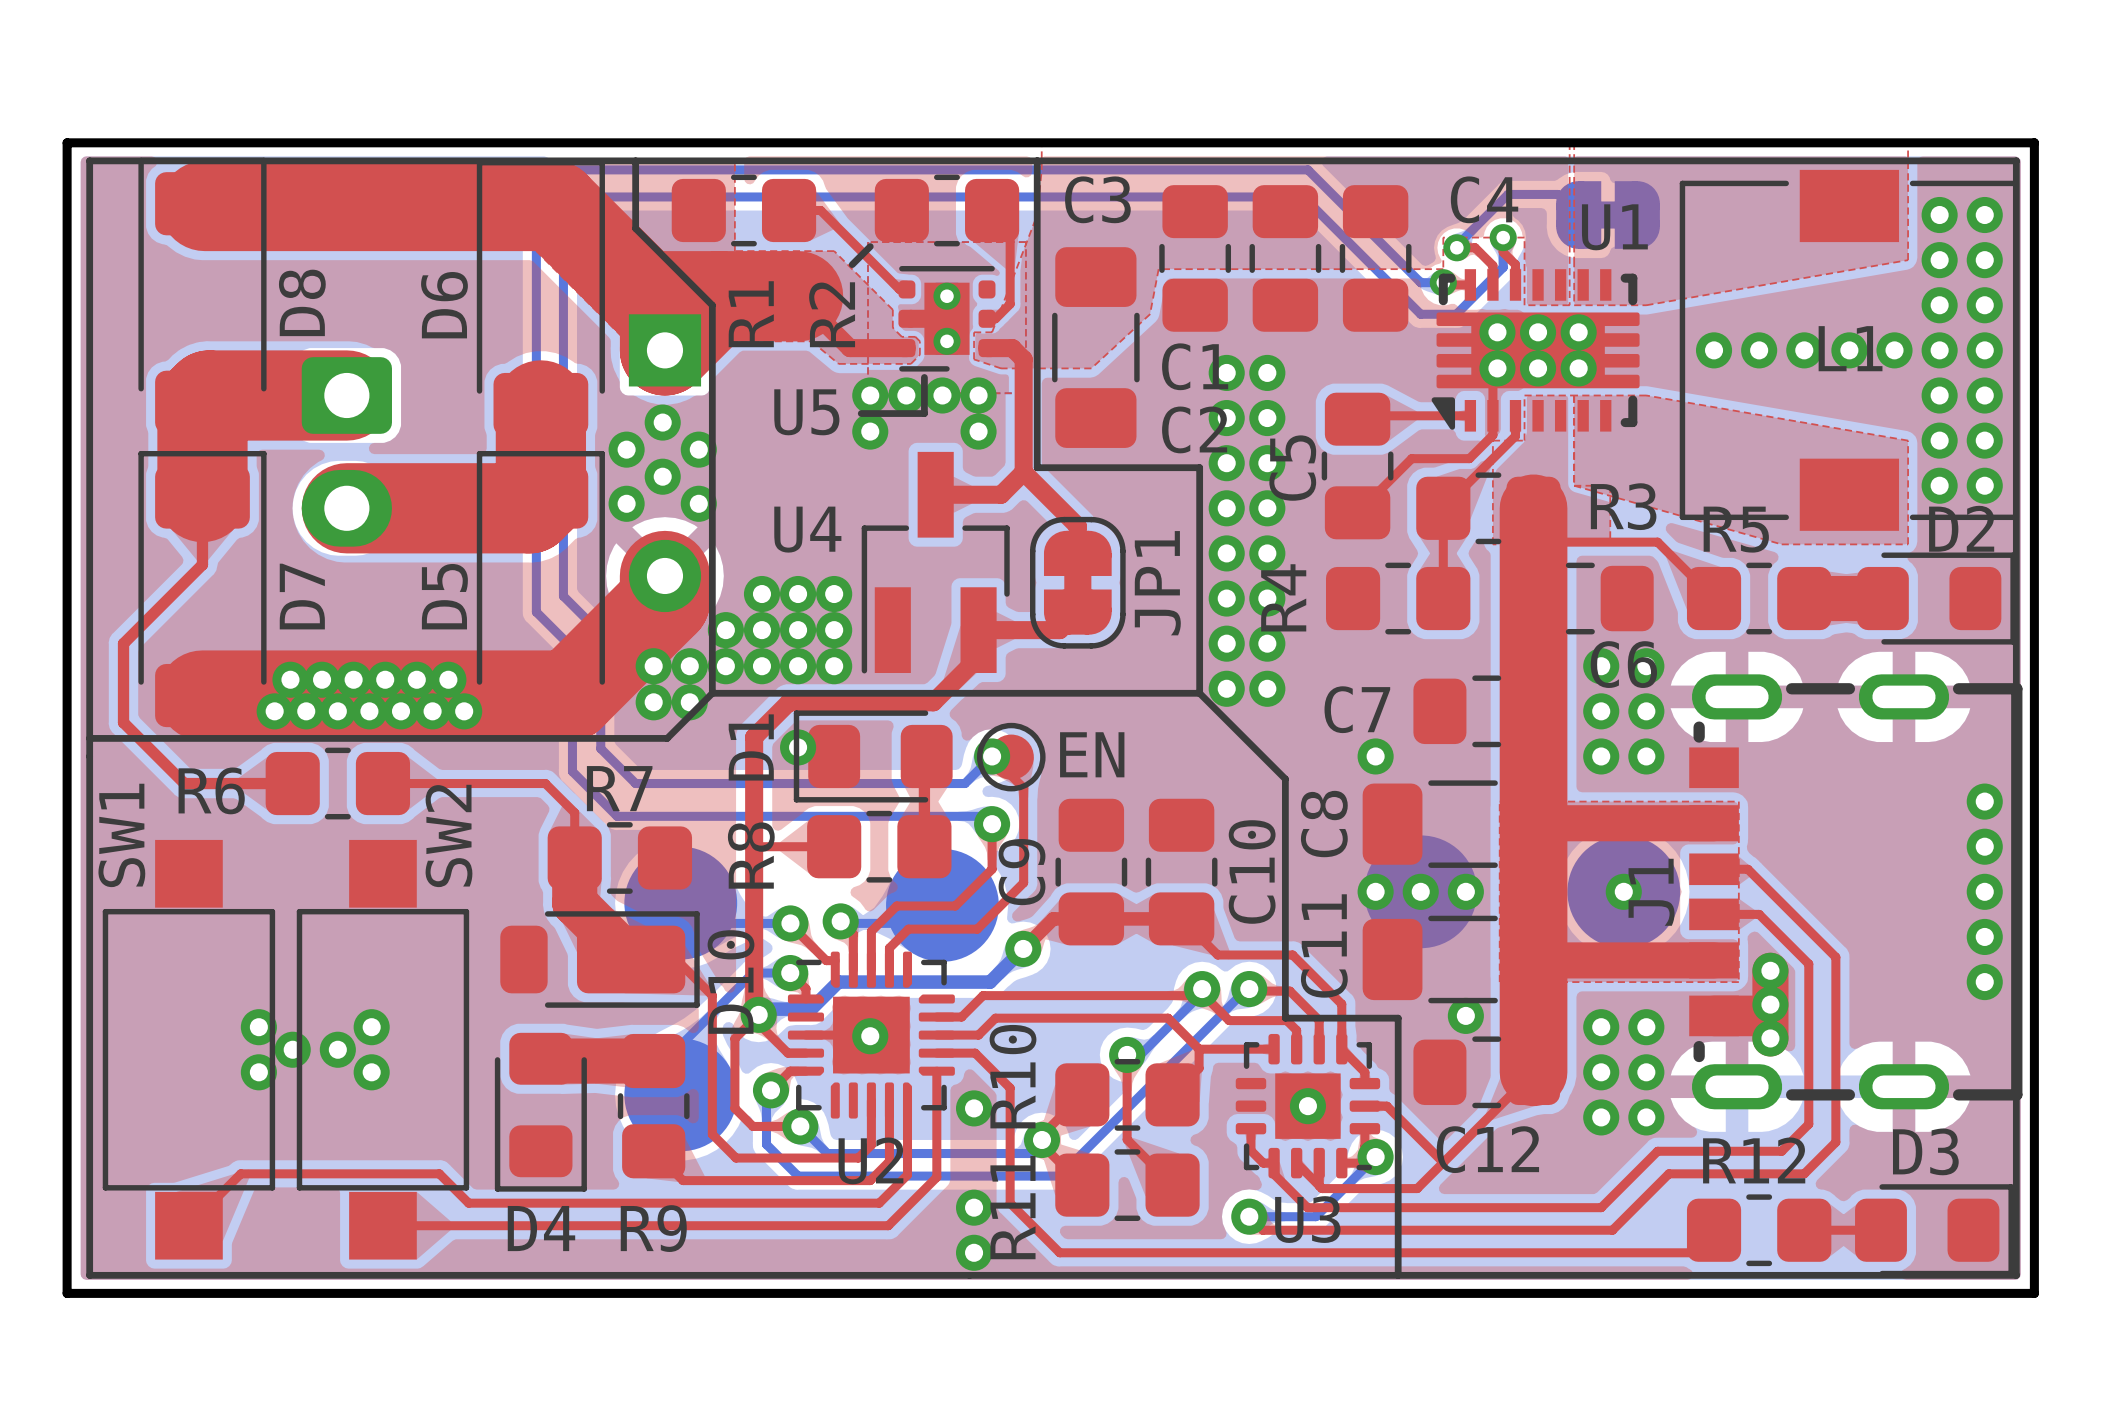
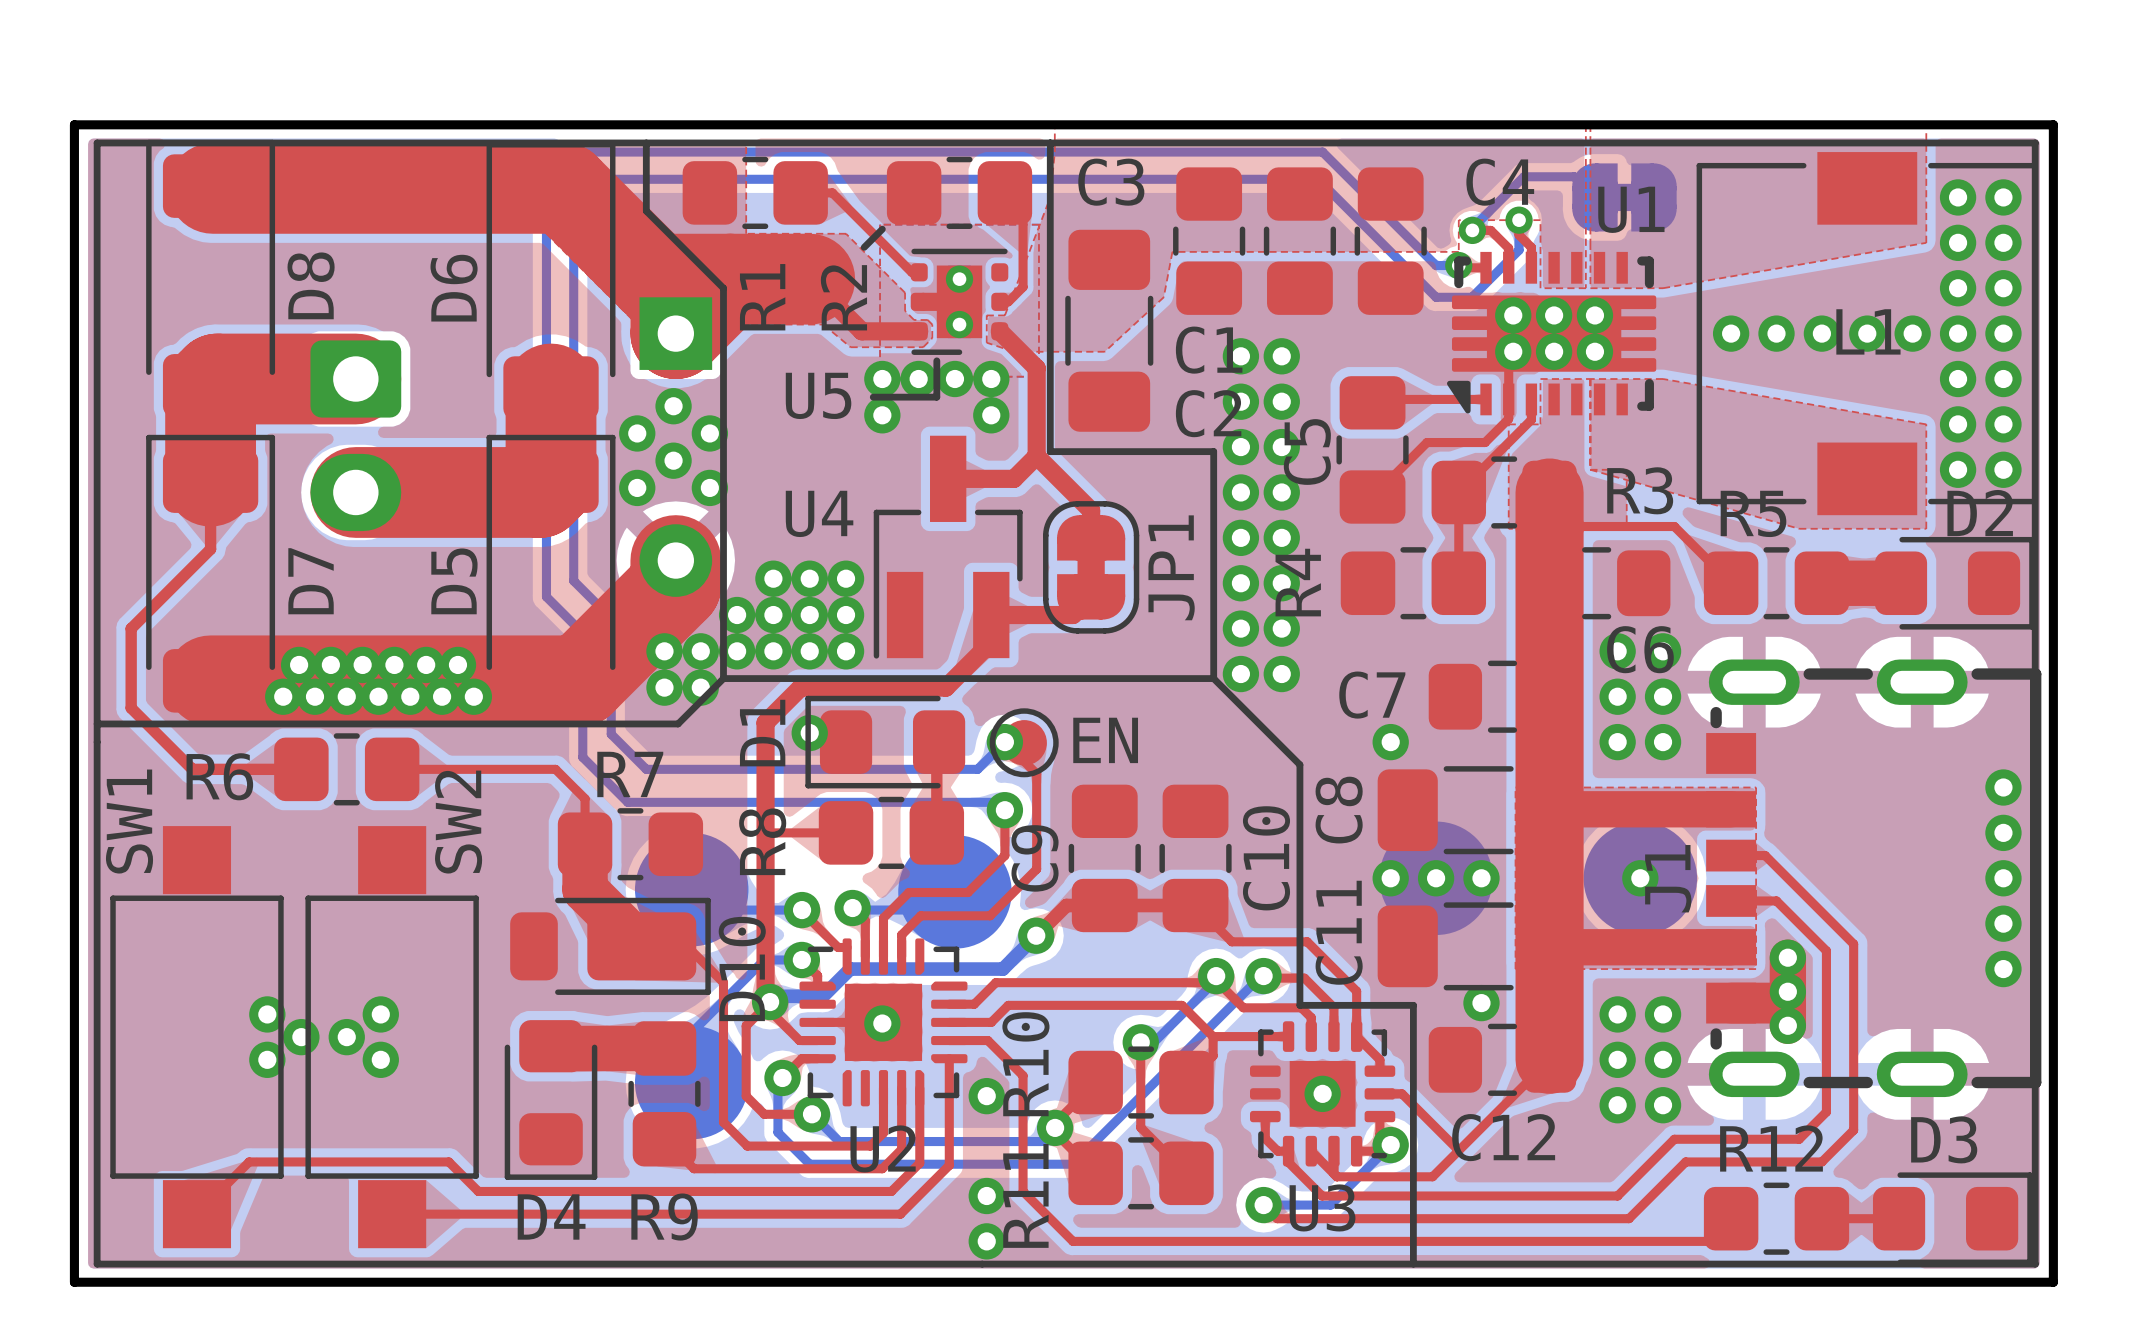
top track: (987, 348) (1012, 348) (1023, 359) (1023, 384) -> (999, 331) (1036, 368)

